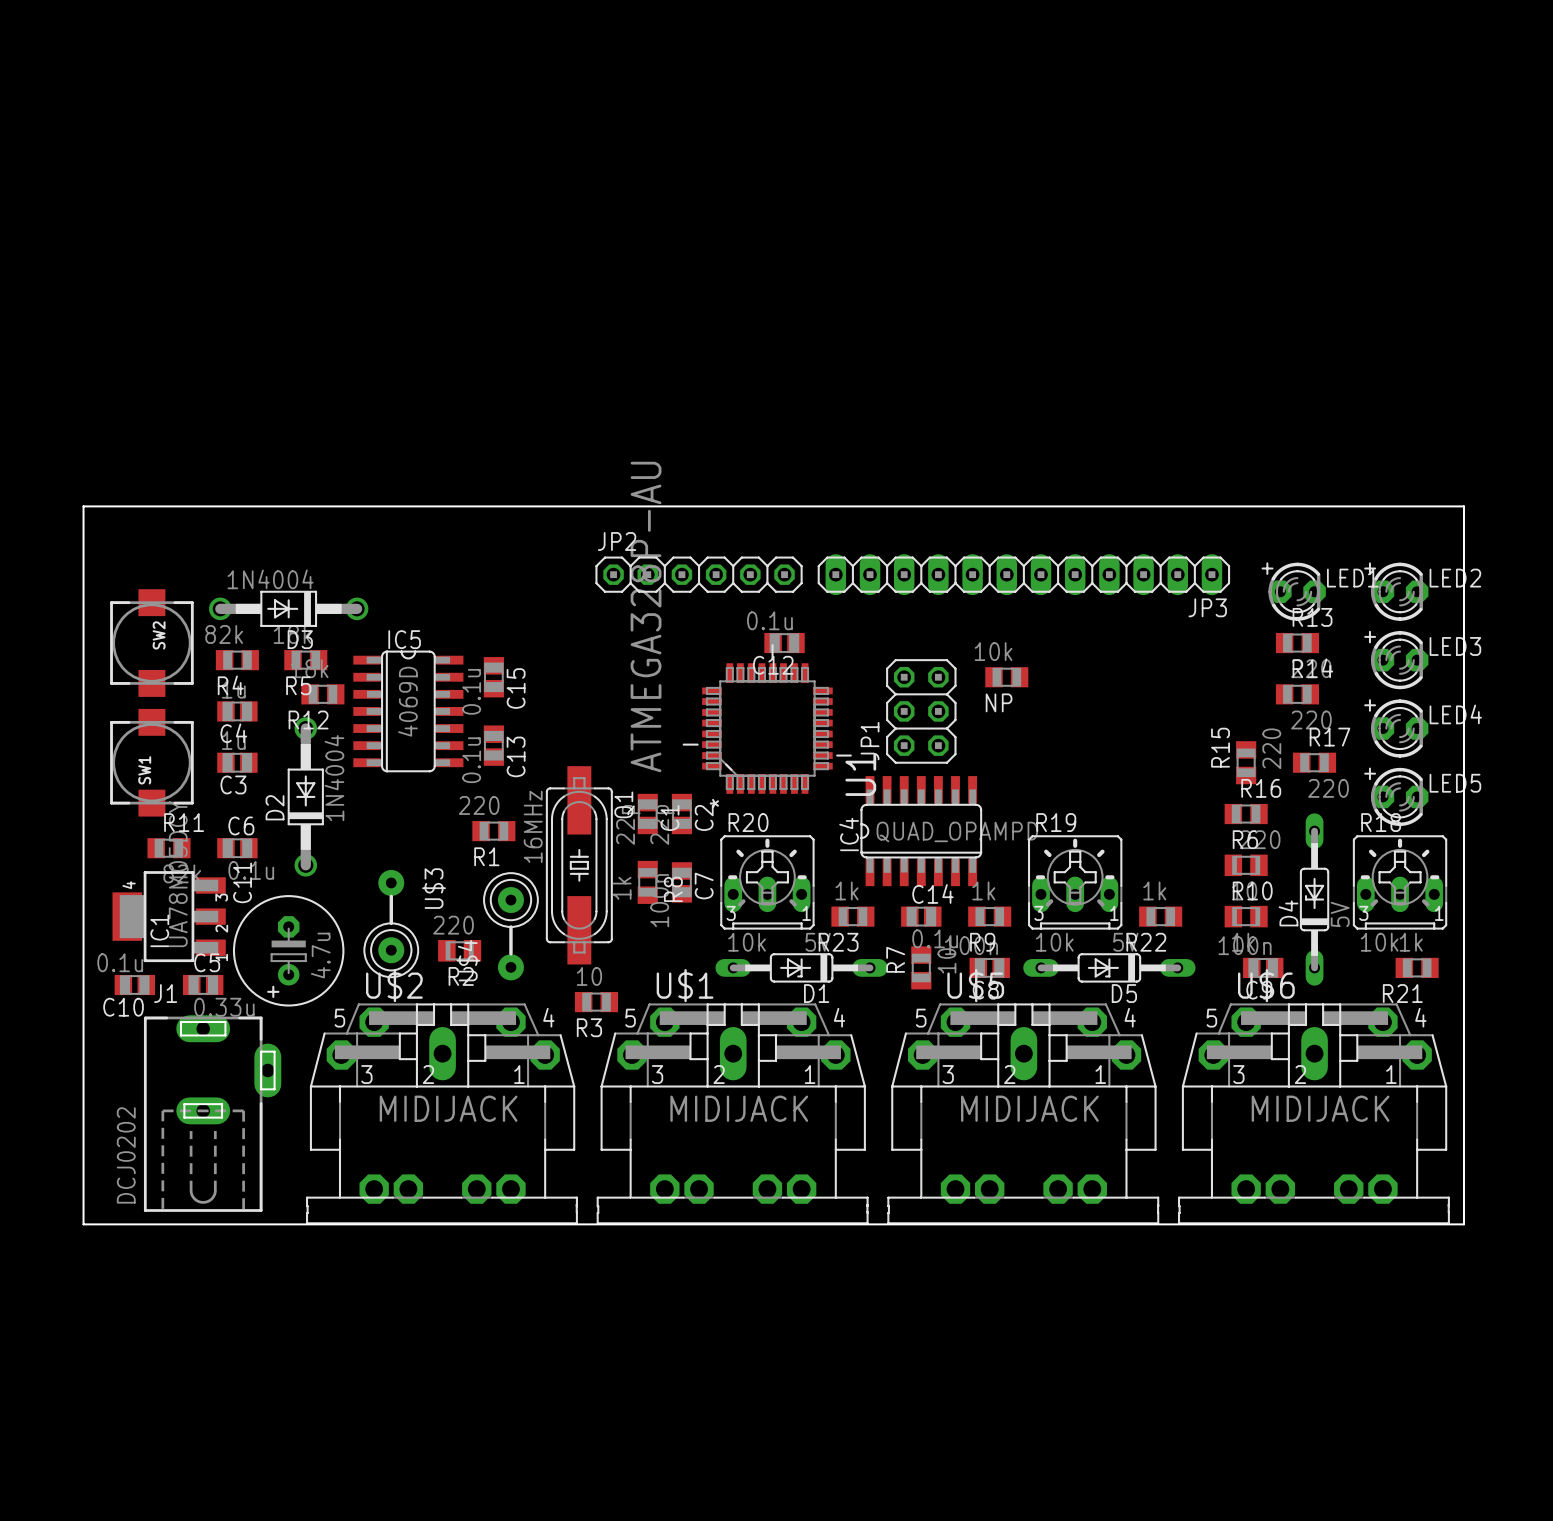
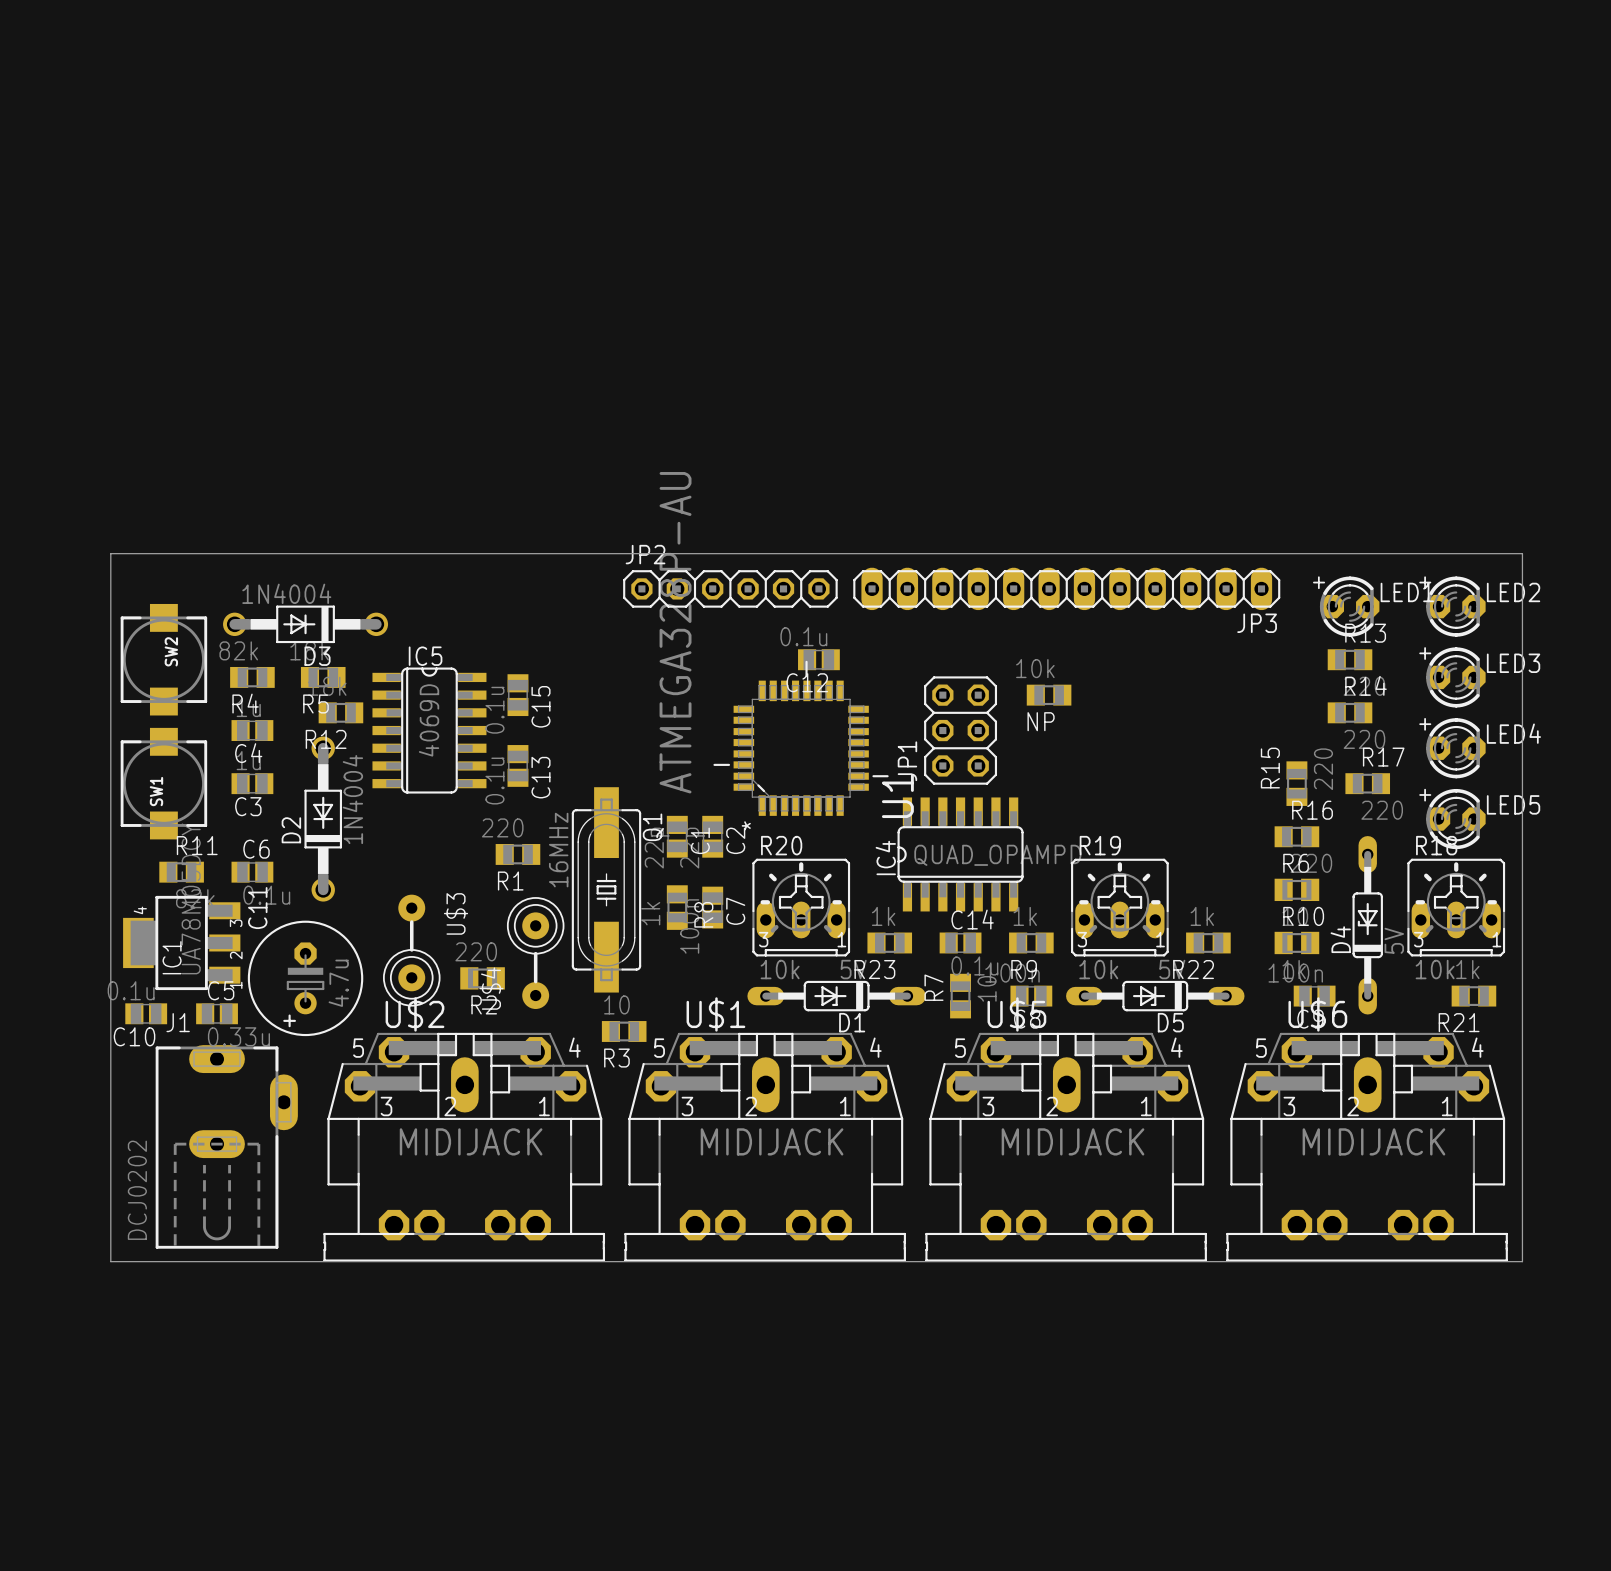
board edge: (1463, 540) (1463, 506) (83, 506) (83, 1224) (100, 1224) -> (1522, 553) (110, 553) (110, 1261)

